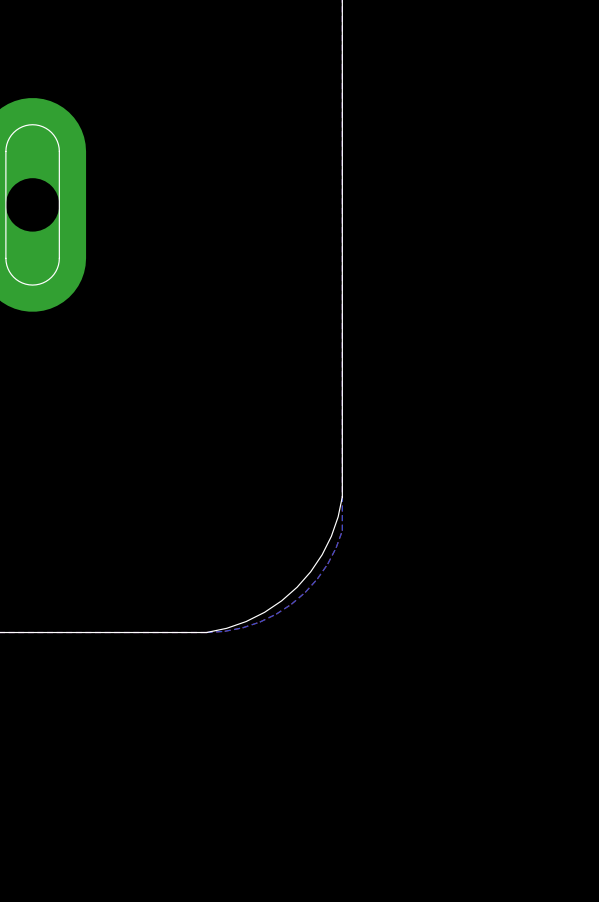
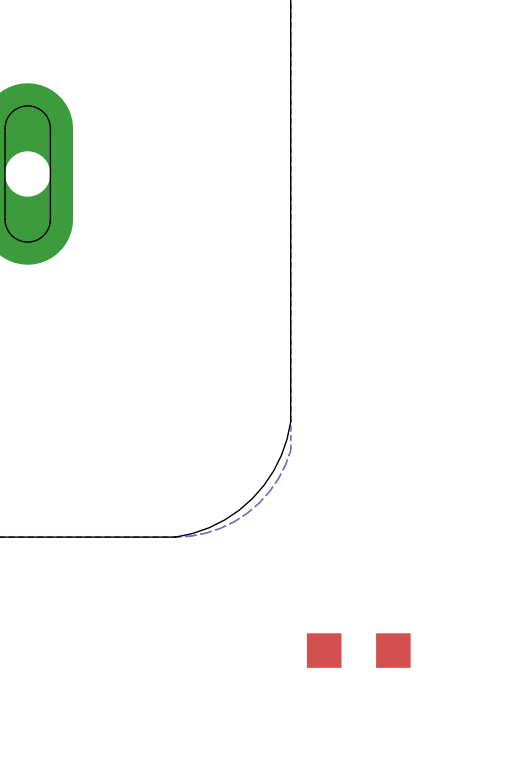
part: none -> (358, 650)

